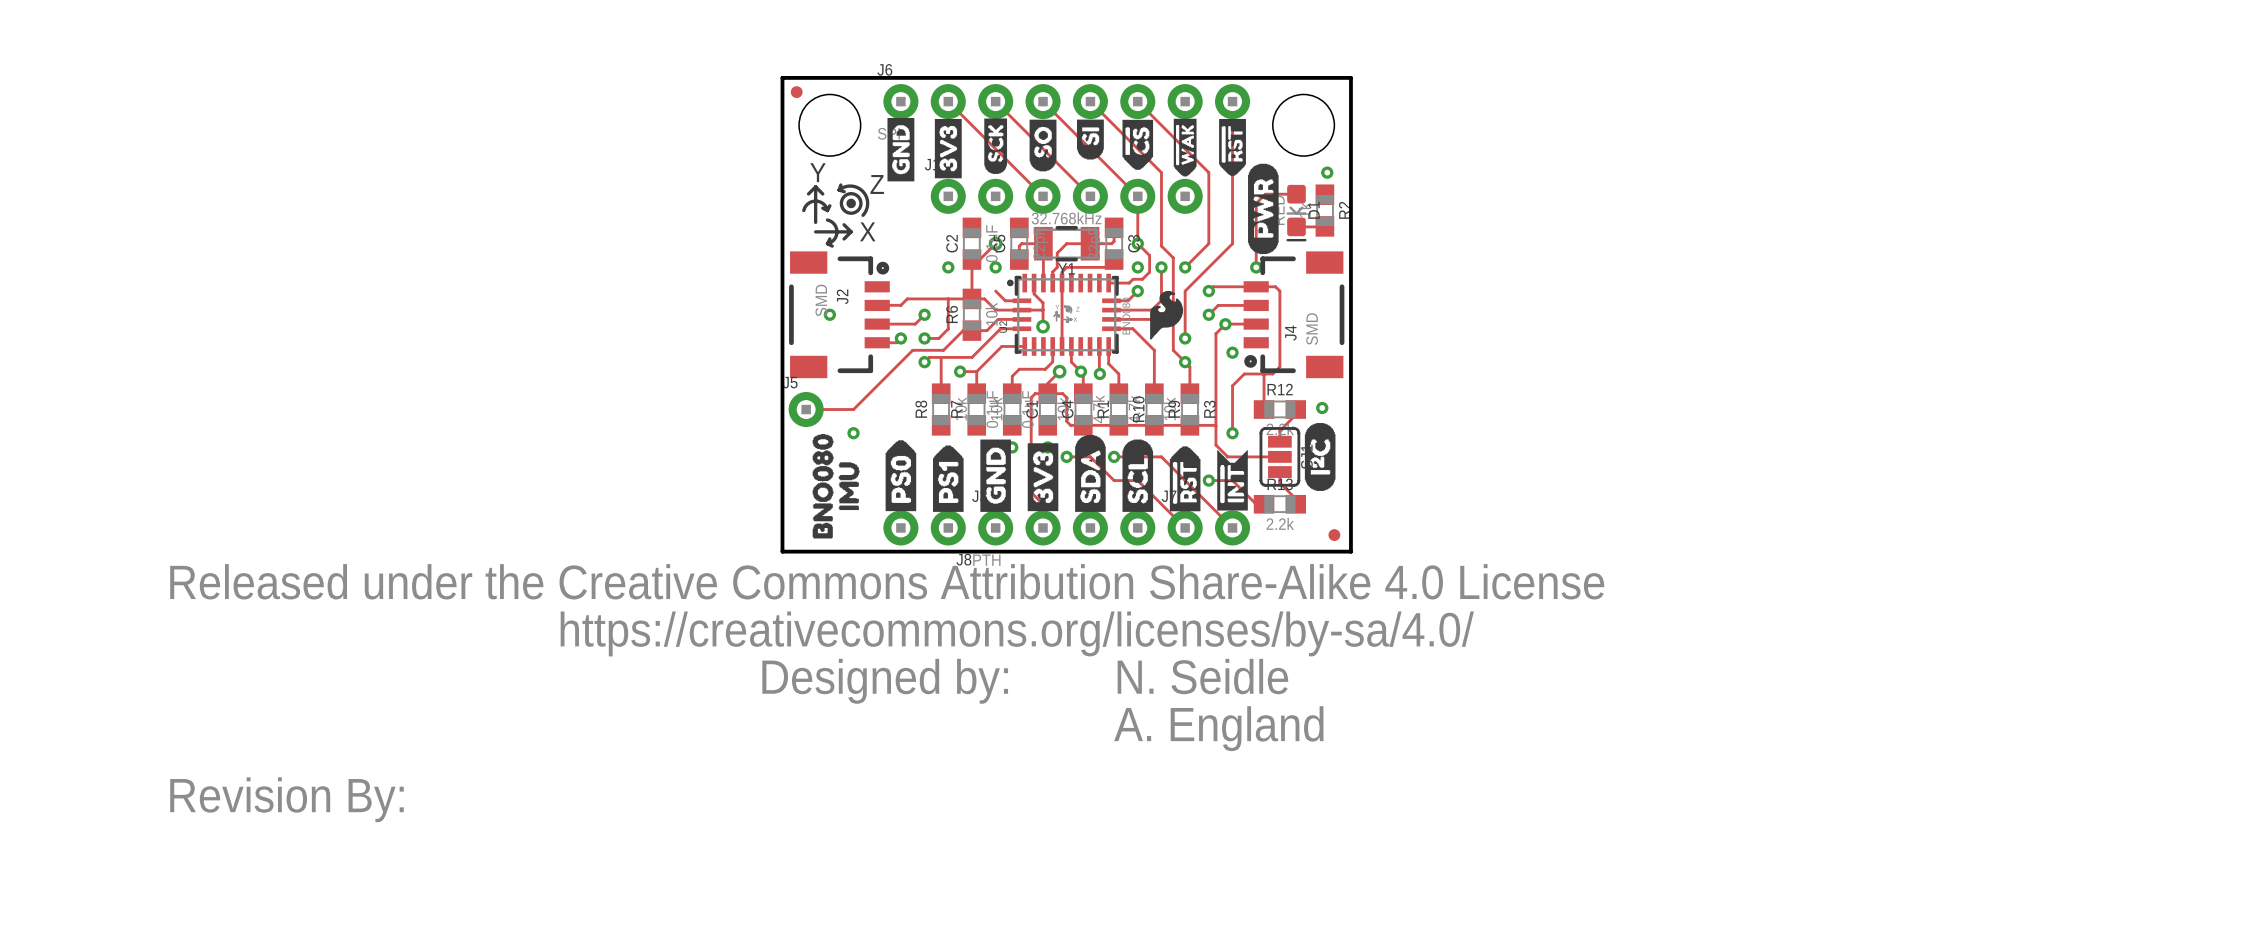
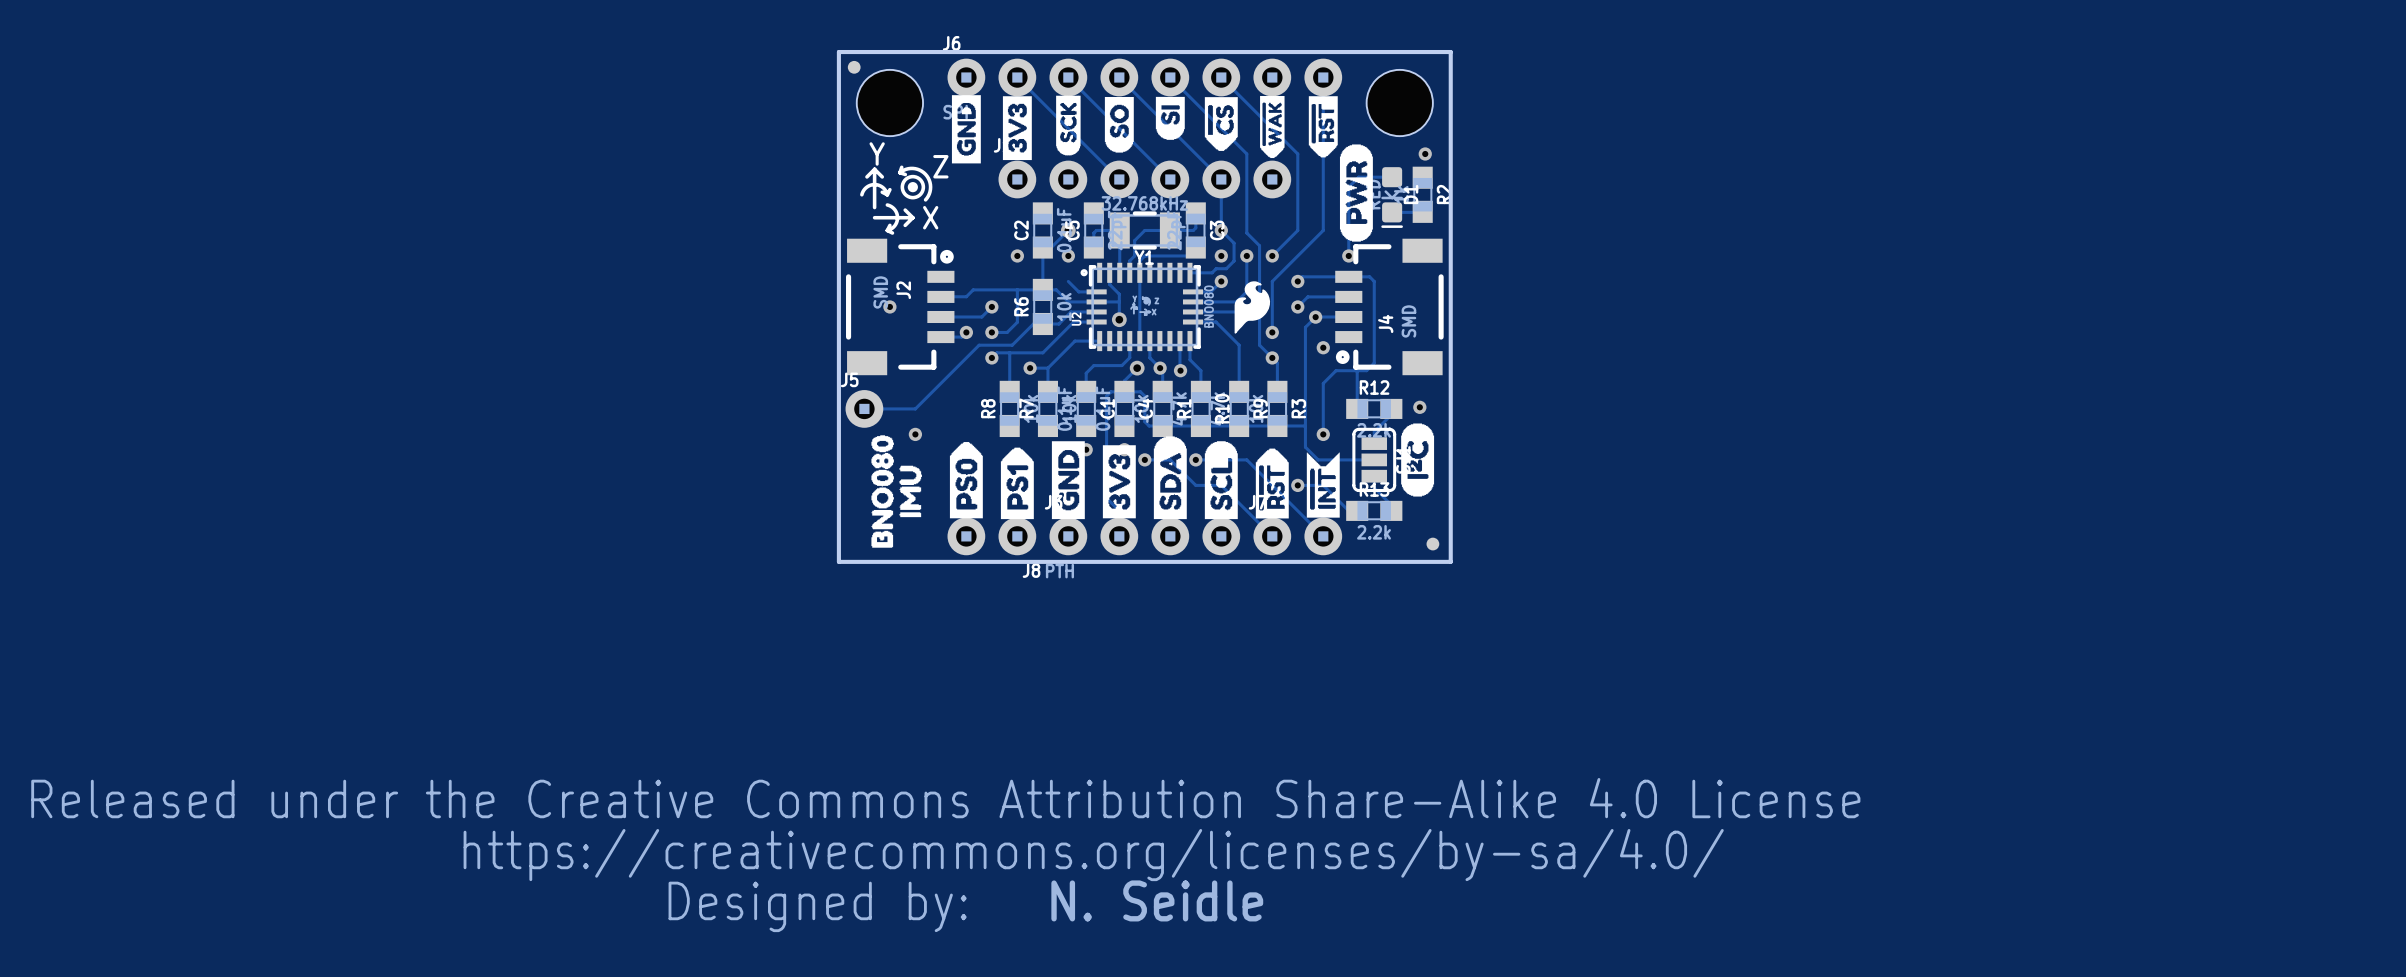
drawing position: (887, 633) -> (945, 855)
text position: N. Seidle (1202, 676) -> N. Seidle (1157, 900)
text: A. England (1218, 728) -> none
drawing: [170, 777, 404, 823] -> none

